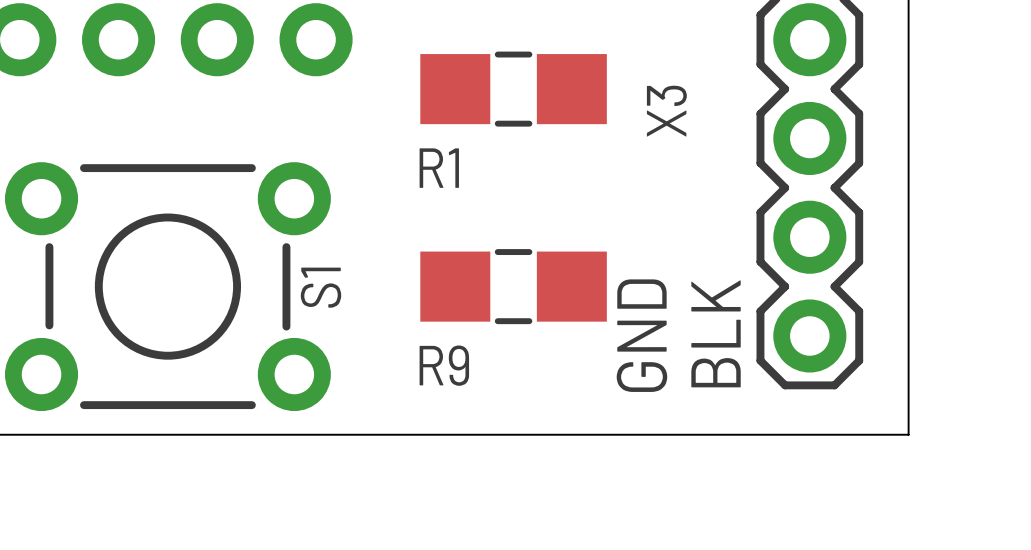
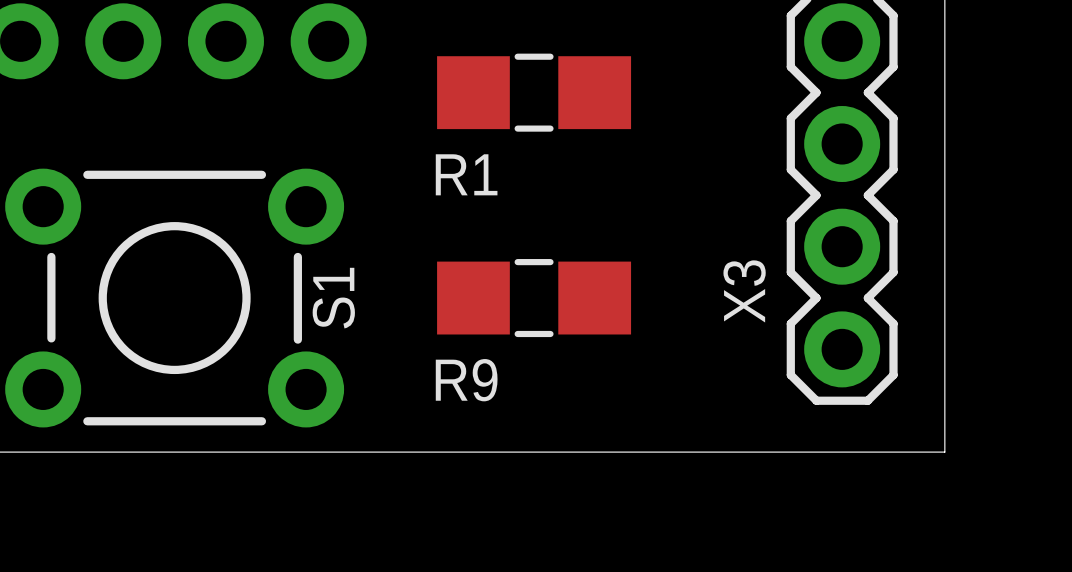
X3 name position: X3 (666, 111) -> X3 (744, 291)
text: BLK (716, 333) -> none
text: GND (641, 335) -> none

